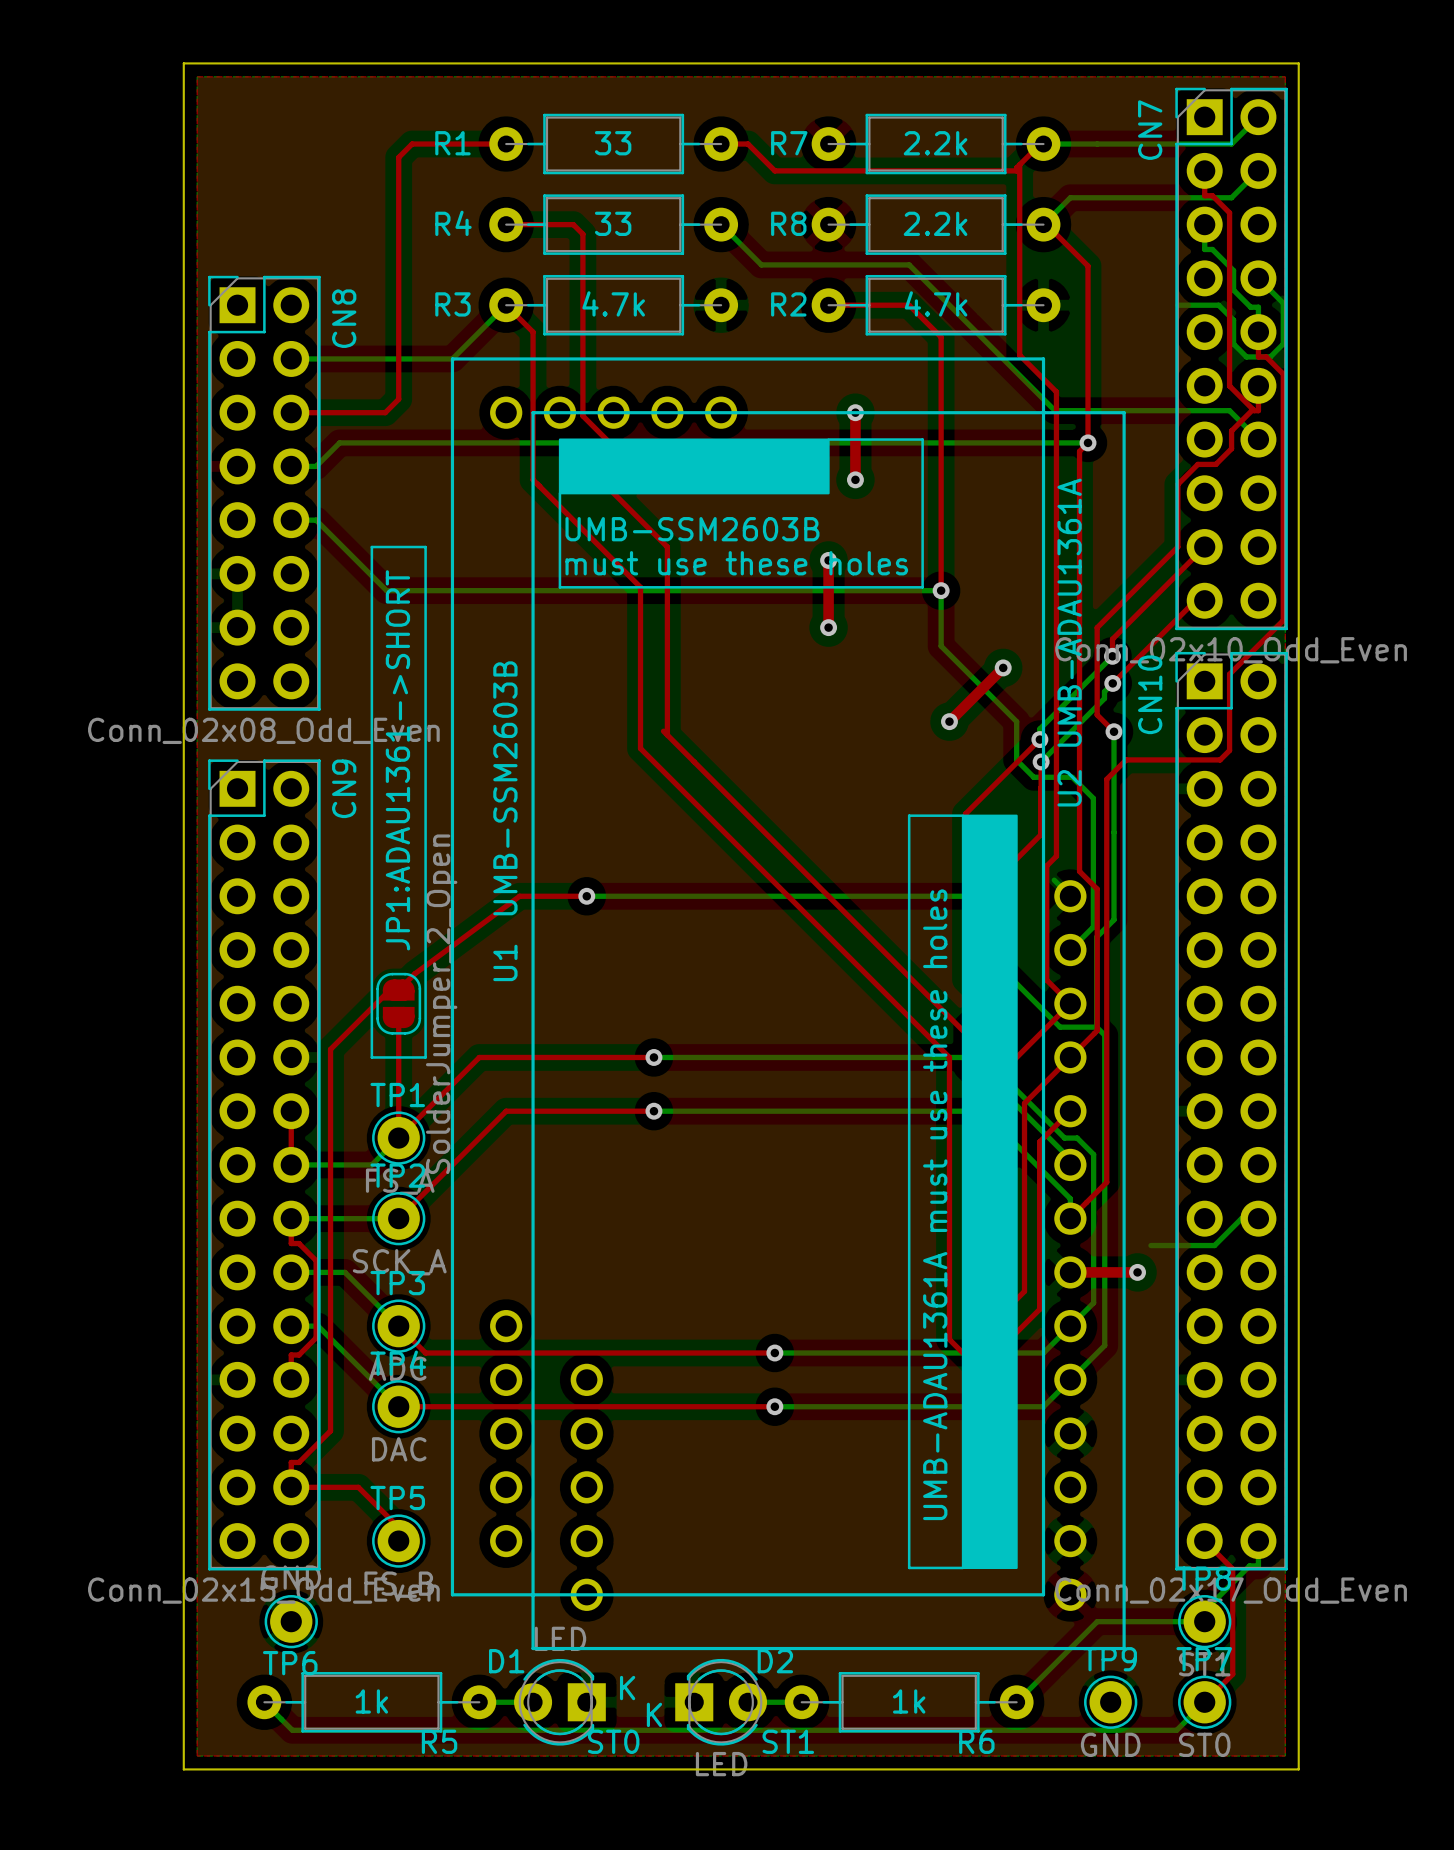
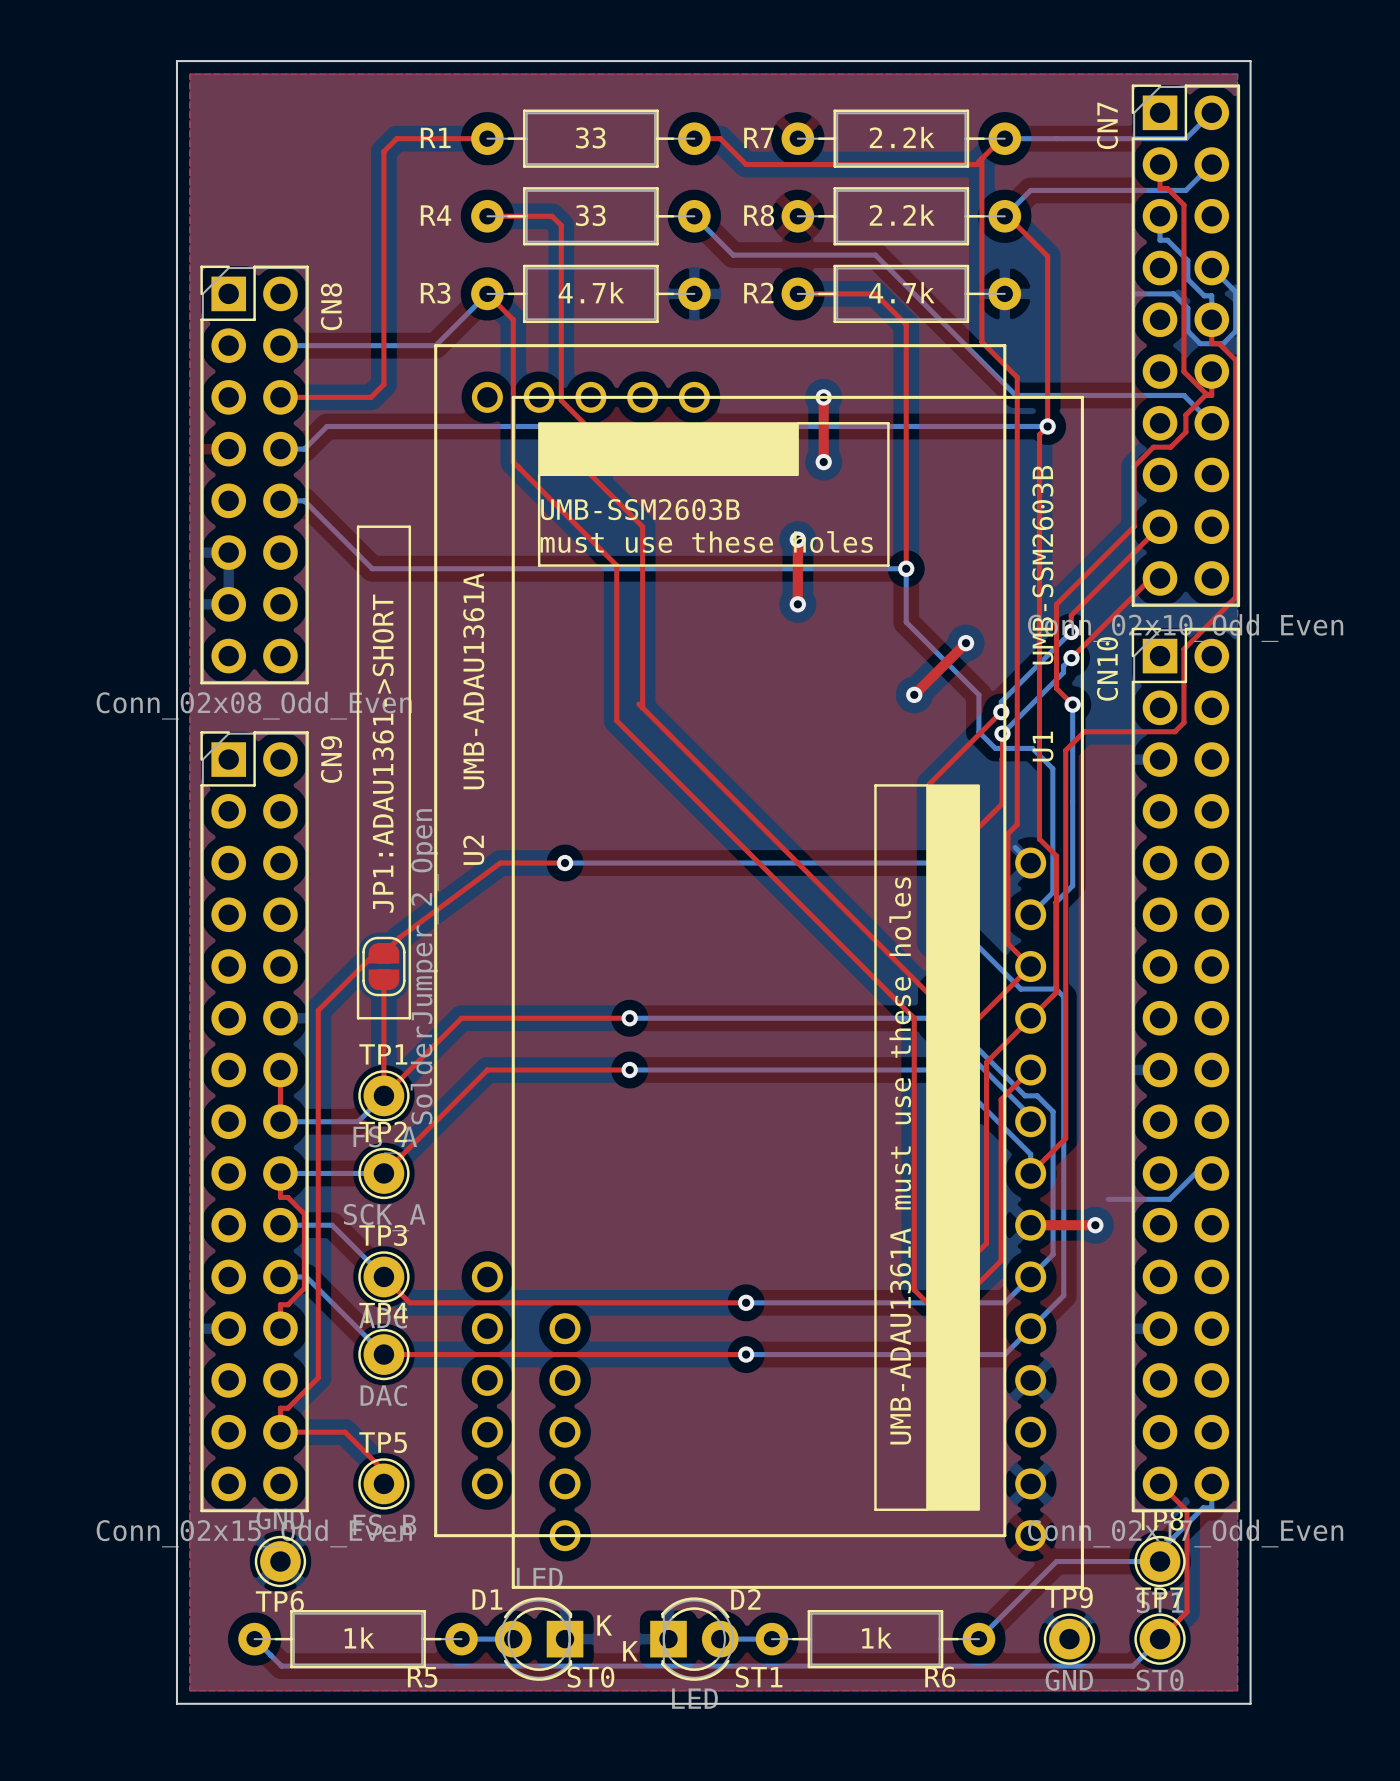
U2 value position: UMB-ADAU1361A (1069, 612) -> UMB-ADAU1361A (473, 681)
U1 value position: UMB-SSM2603B (505, 788) -> UMB-SSM2603B (1042, 565)
U2 name position: U2 (1069, 788) -> U2 (473, 850)
U1 name position: U1 (505, 962) -> U1 (1043, 746)

